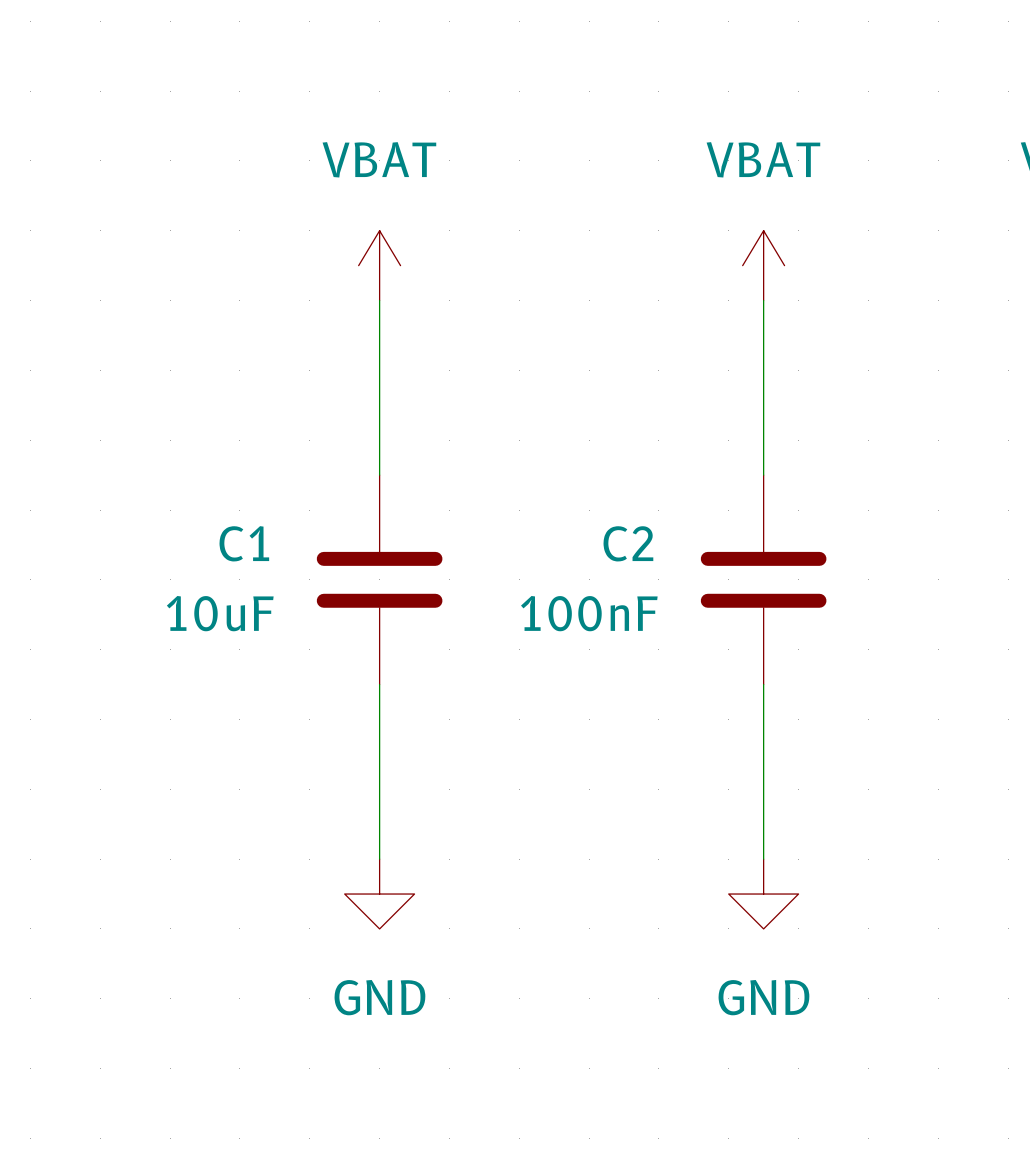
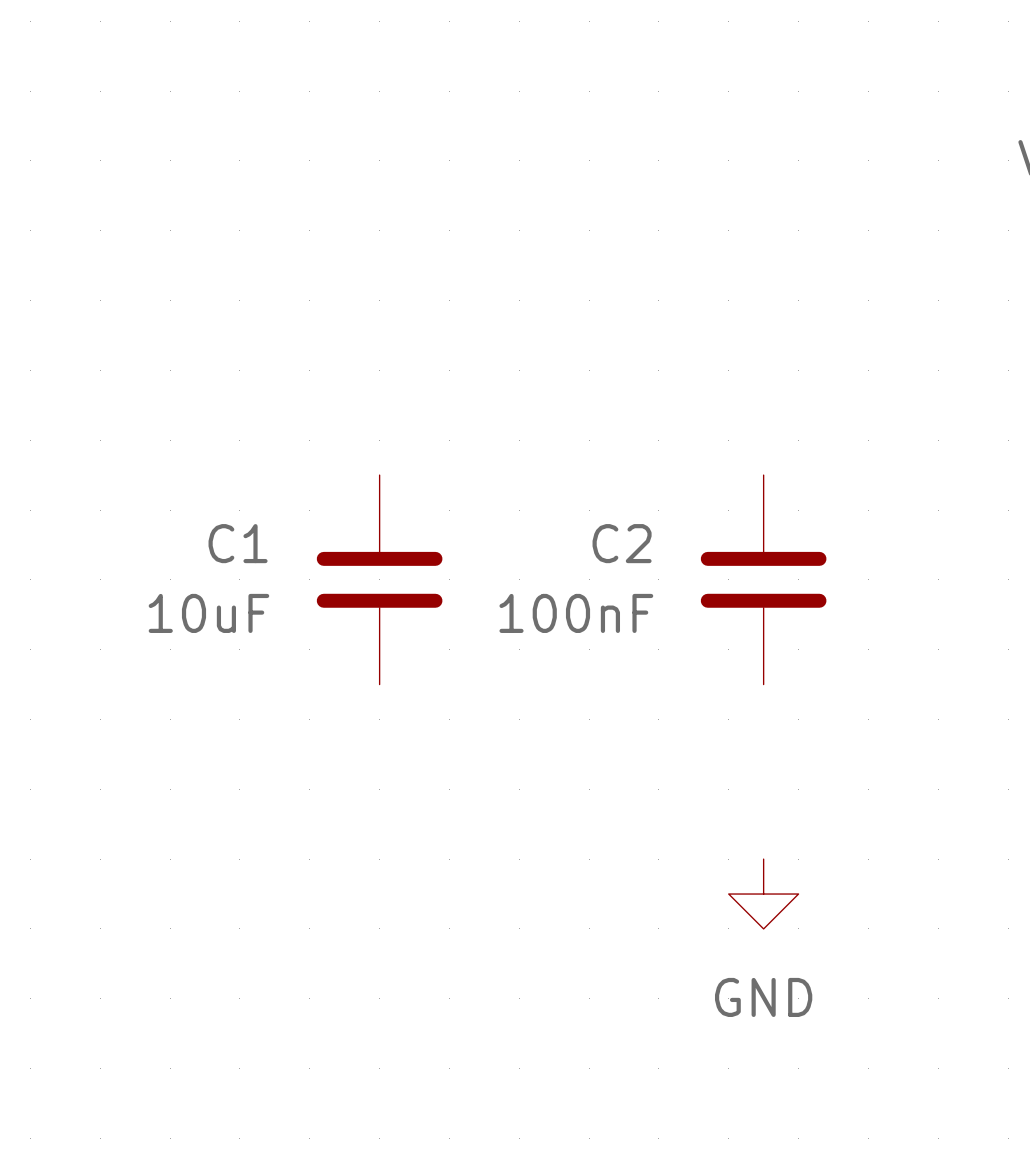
power symbol: VBAT (379, 265) -> none
power symbol: VBAT (763, 265) -> none
wire: (379, 300) (379, 475) -> none
wire: (763, 300) (763, 475) -> none
wire: (379, 684) (379, 859) -> none
wire: (763, 684) (763, 859) -> none
power symbol: GND (379, 894) -> none

